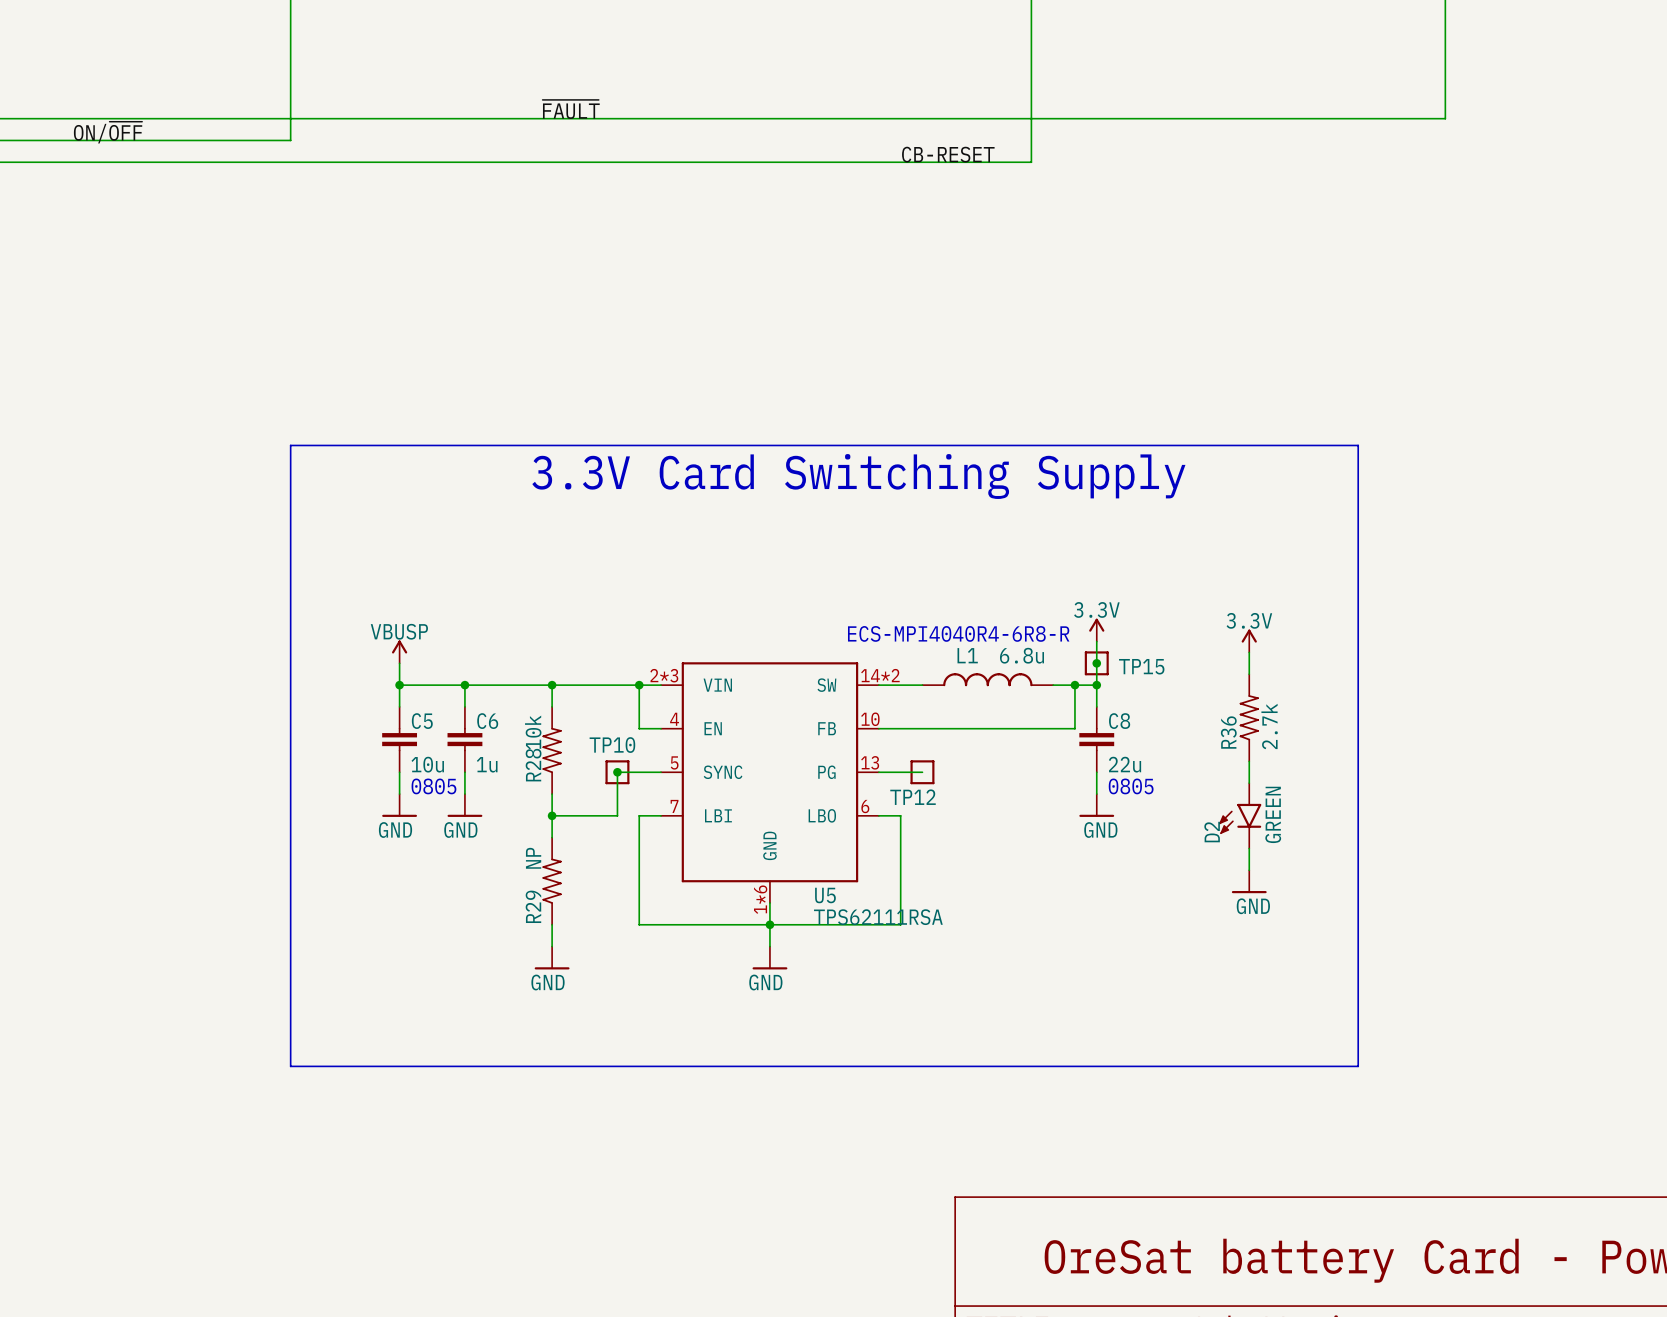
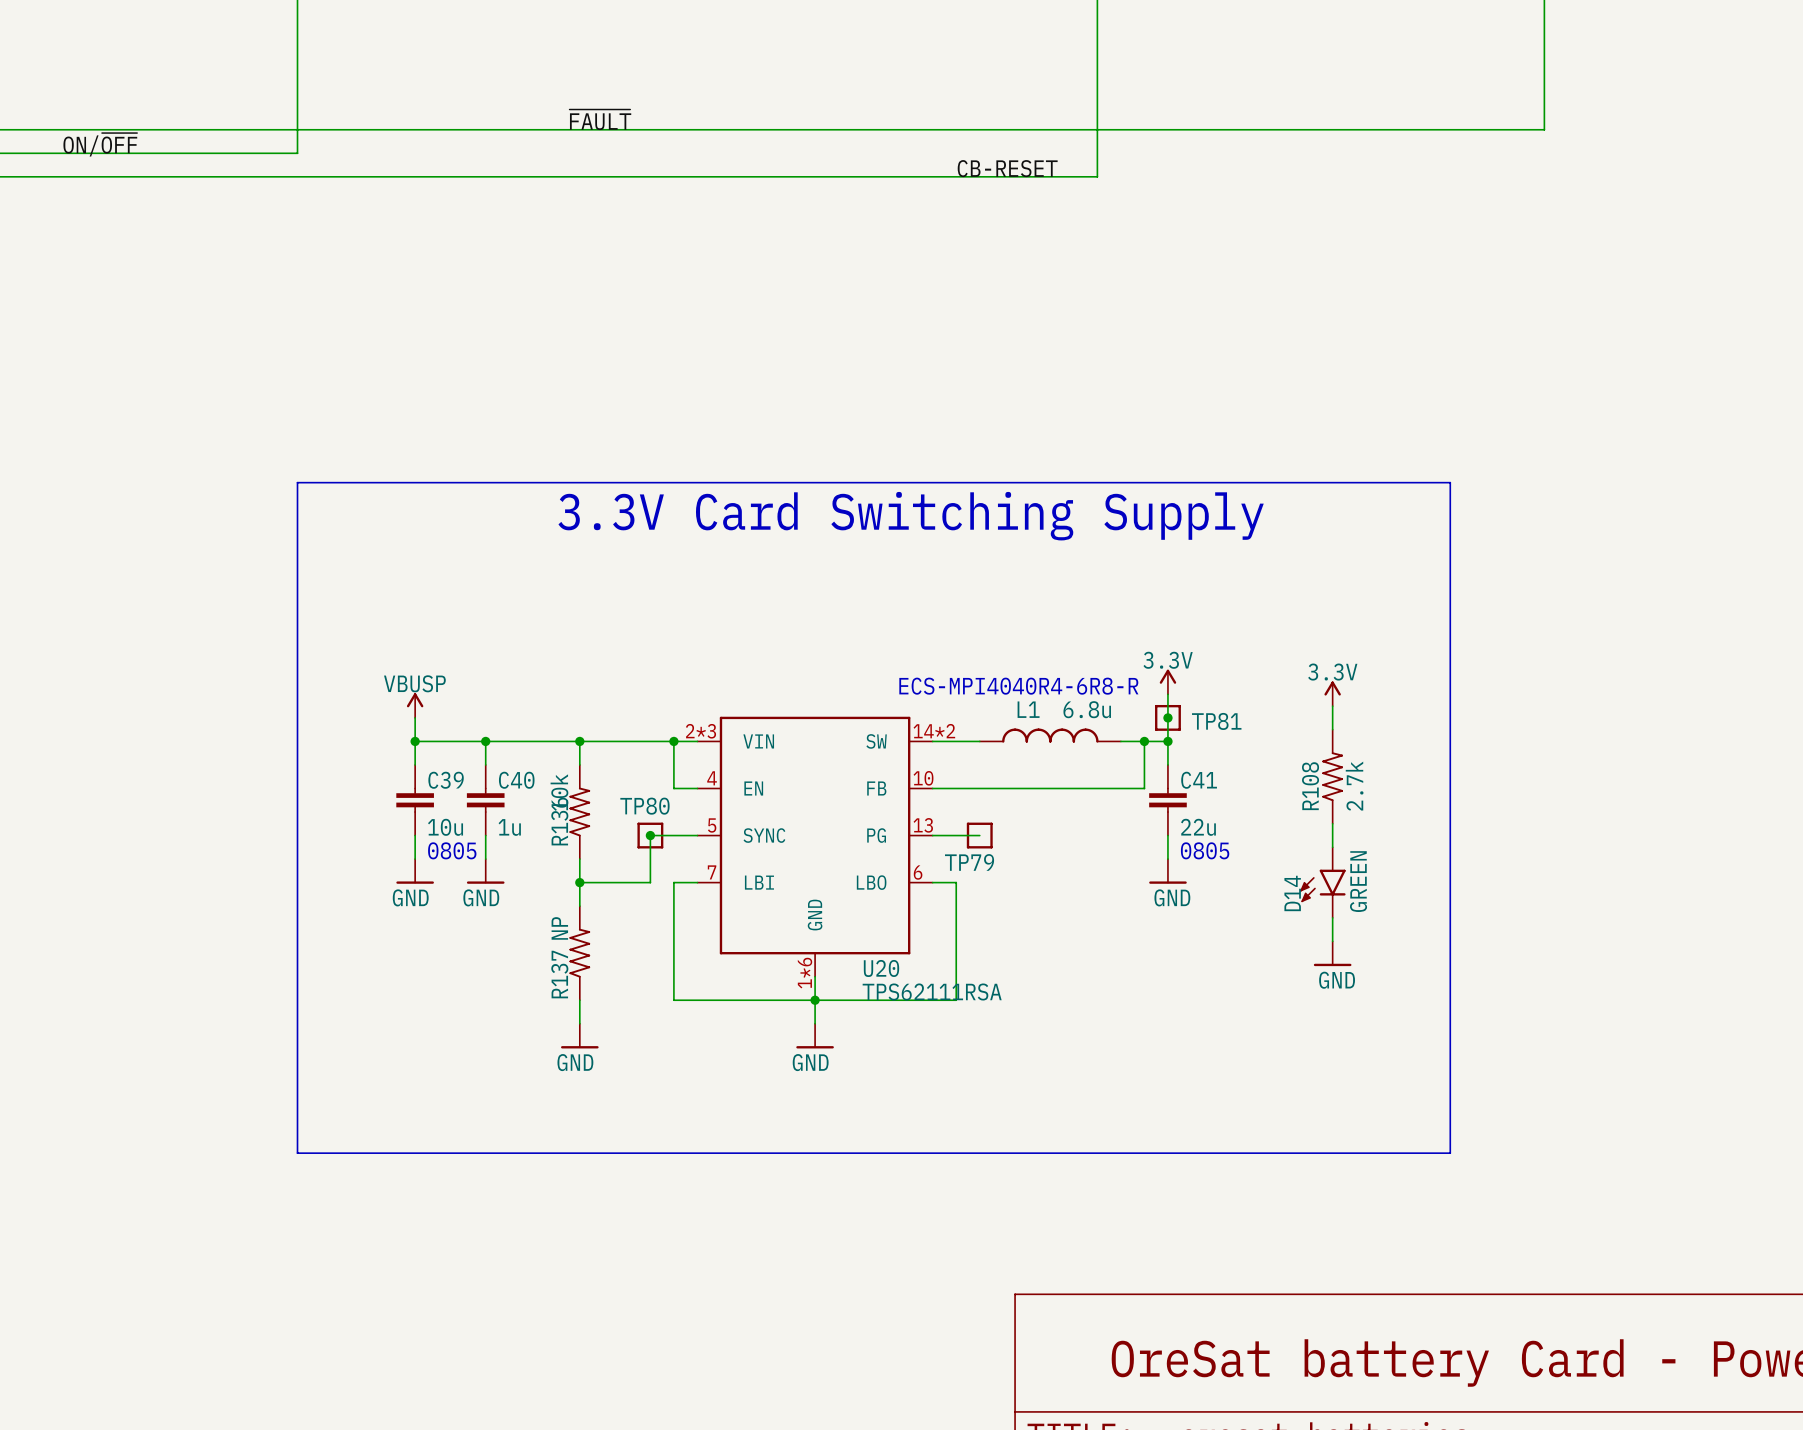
TP15 name: TP15 (1141, 666) -> TP81 (1216, 721)
C5 name: C5 (422, 721) -> C39 (446, 780)
C6 name: C6 (487, 721) -> C40 (516, 780)
C8 name: C8 (1119, 721) -> C41 (1199, 780)
R36 name: R36 (1228, 732) -> R108 (1310, 786)
TP10 name: TP10 (612, 745) -> TP80 (644, 806)
R28 name: R28 (533, 765) -> R136 (559, 821)
TP12 name: TP12 (913, 797) -> TP79 (969, 862)
D2 name: D2 (1212, 832) -> D14 (1292, 893)
U5 name: U5 (825, 895) -> U20 (881, 968)
R29 name: R29 (533, 906) -> R137 (559, 974)

